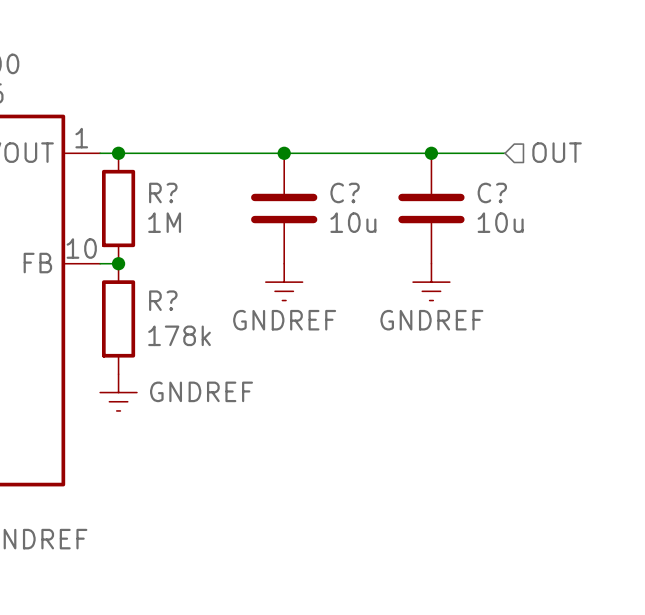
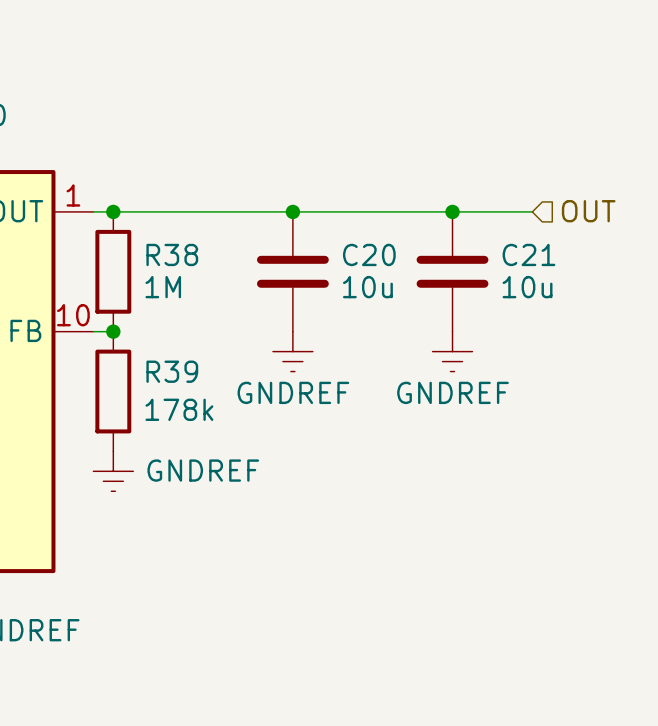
R? name: R? (163, 192) -> R38 (172, 254)
C? name: C? (345, 192) -> C20 (369, 254)
C? name: C? (492, 192) -> C21 (528, 254)
R? name: R? (163, 300) -> R39 (172, 371)

